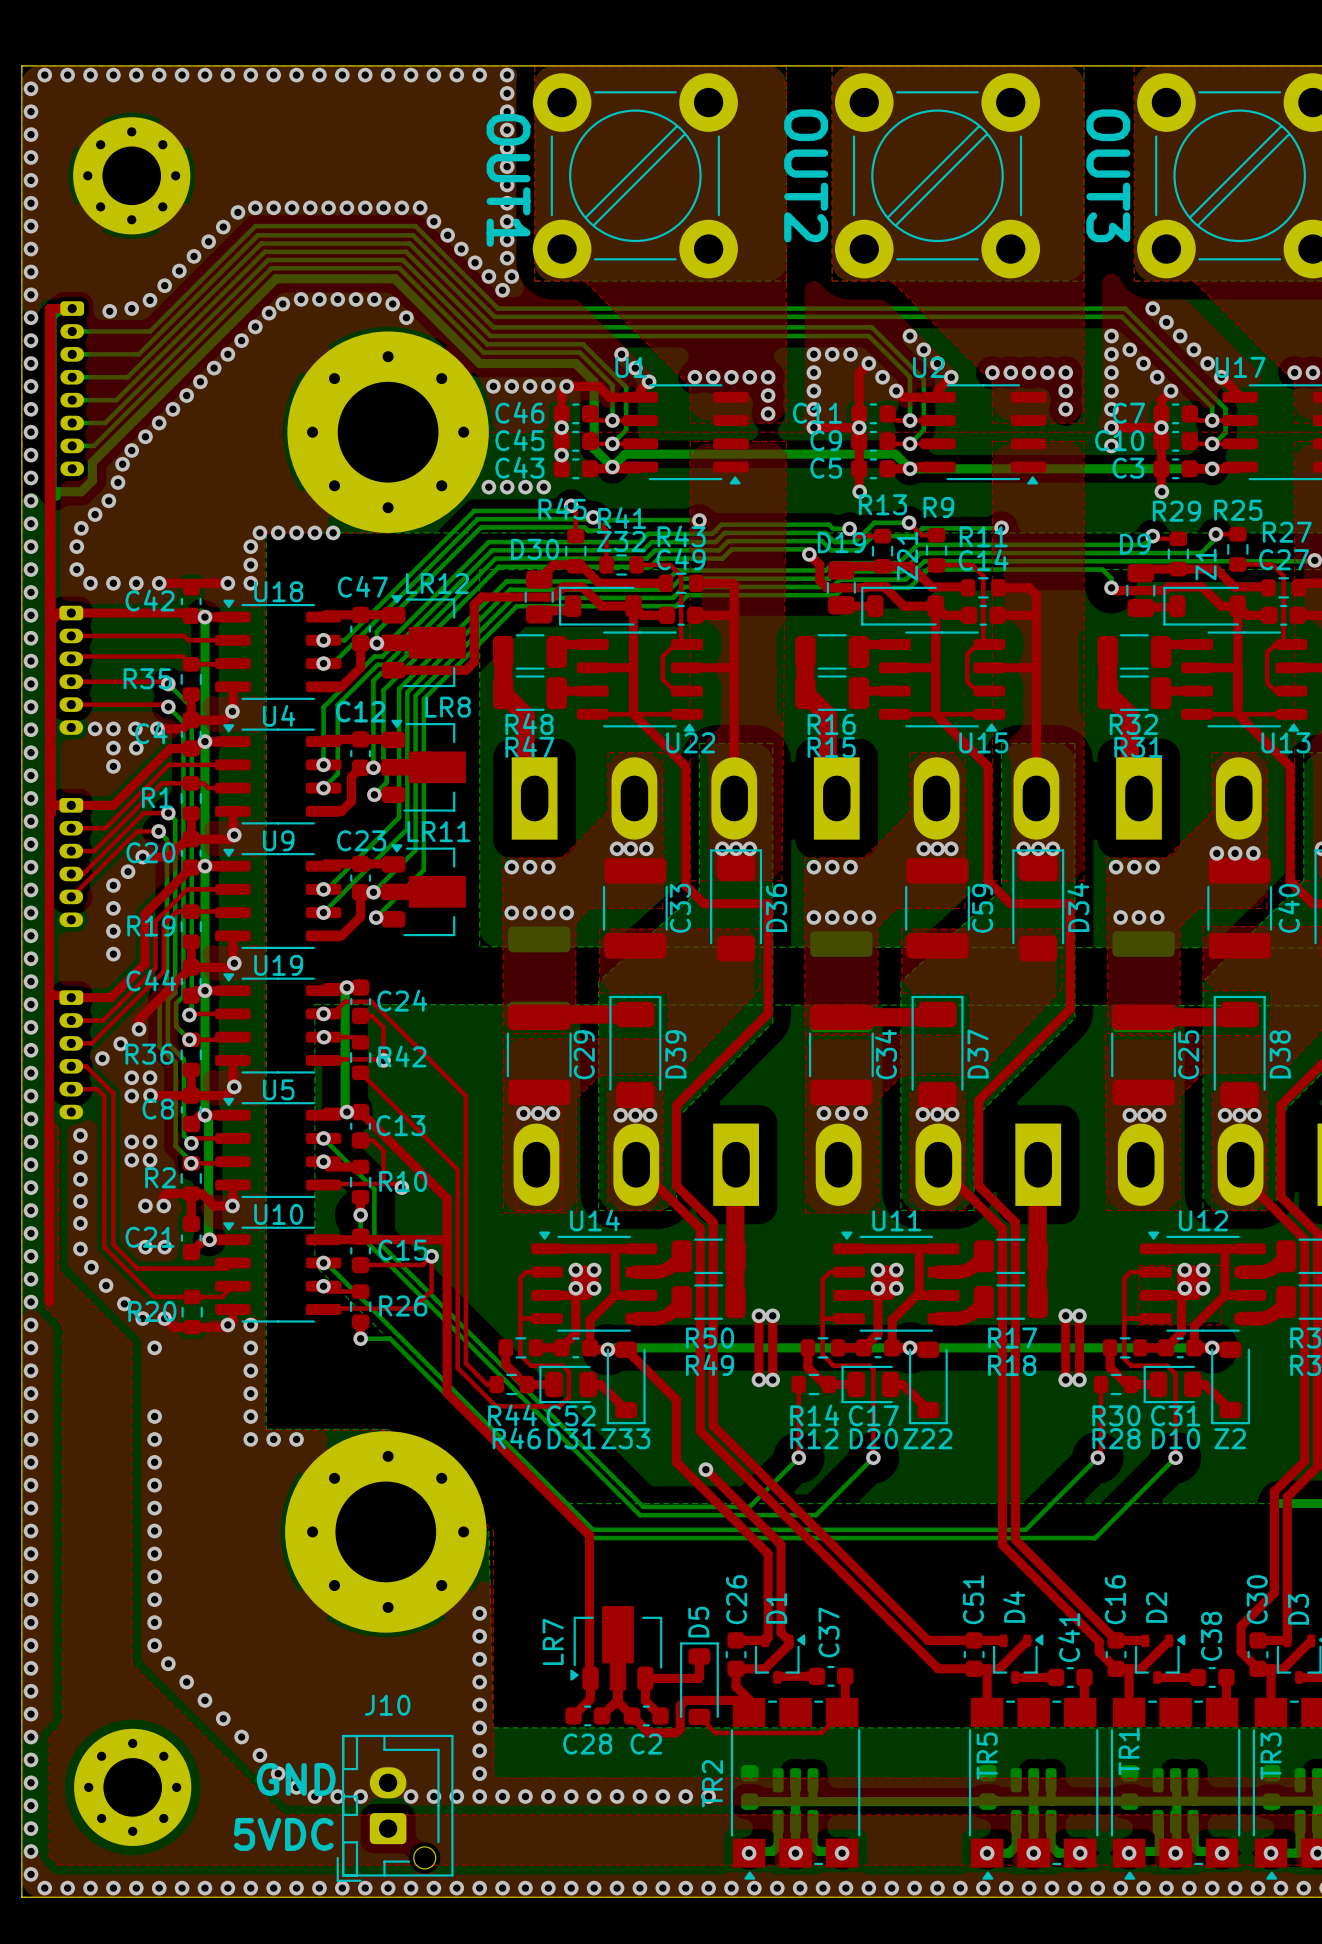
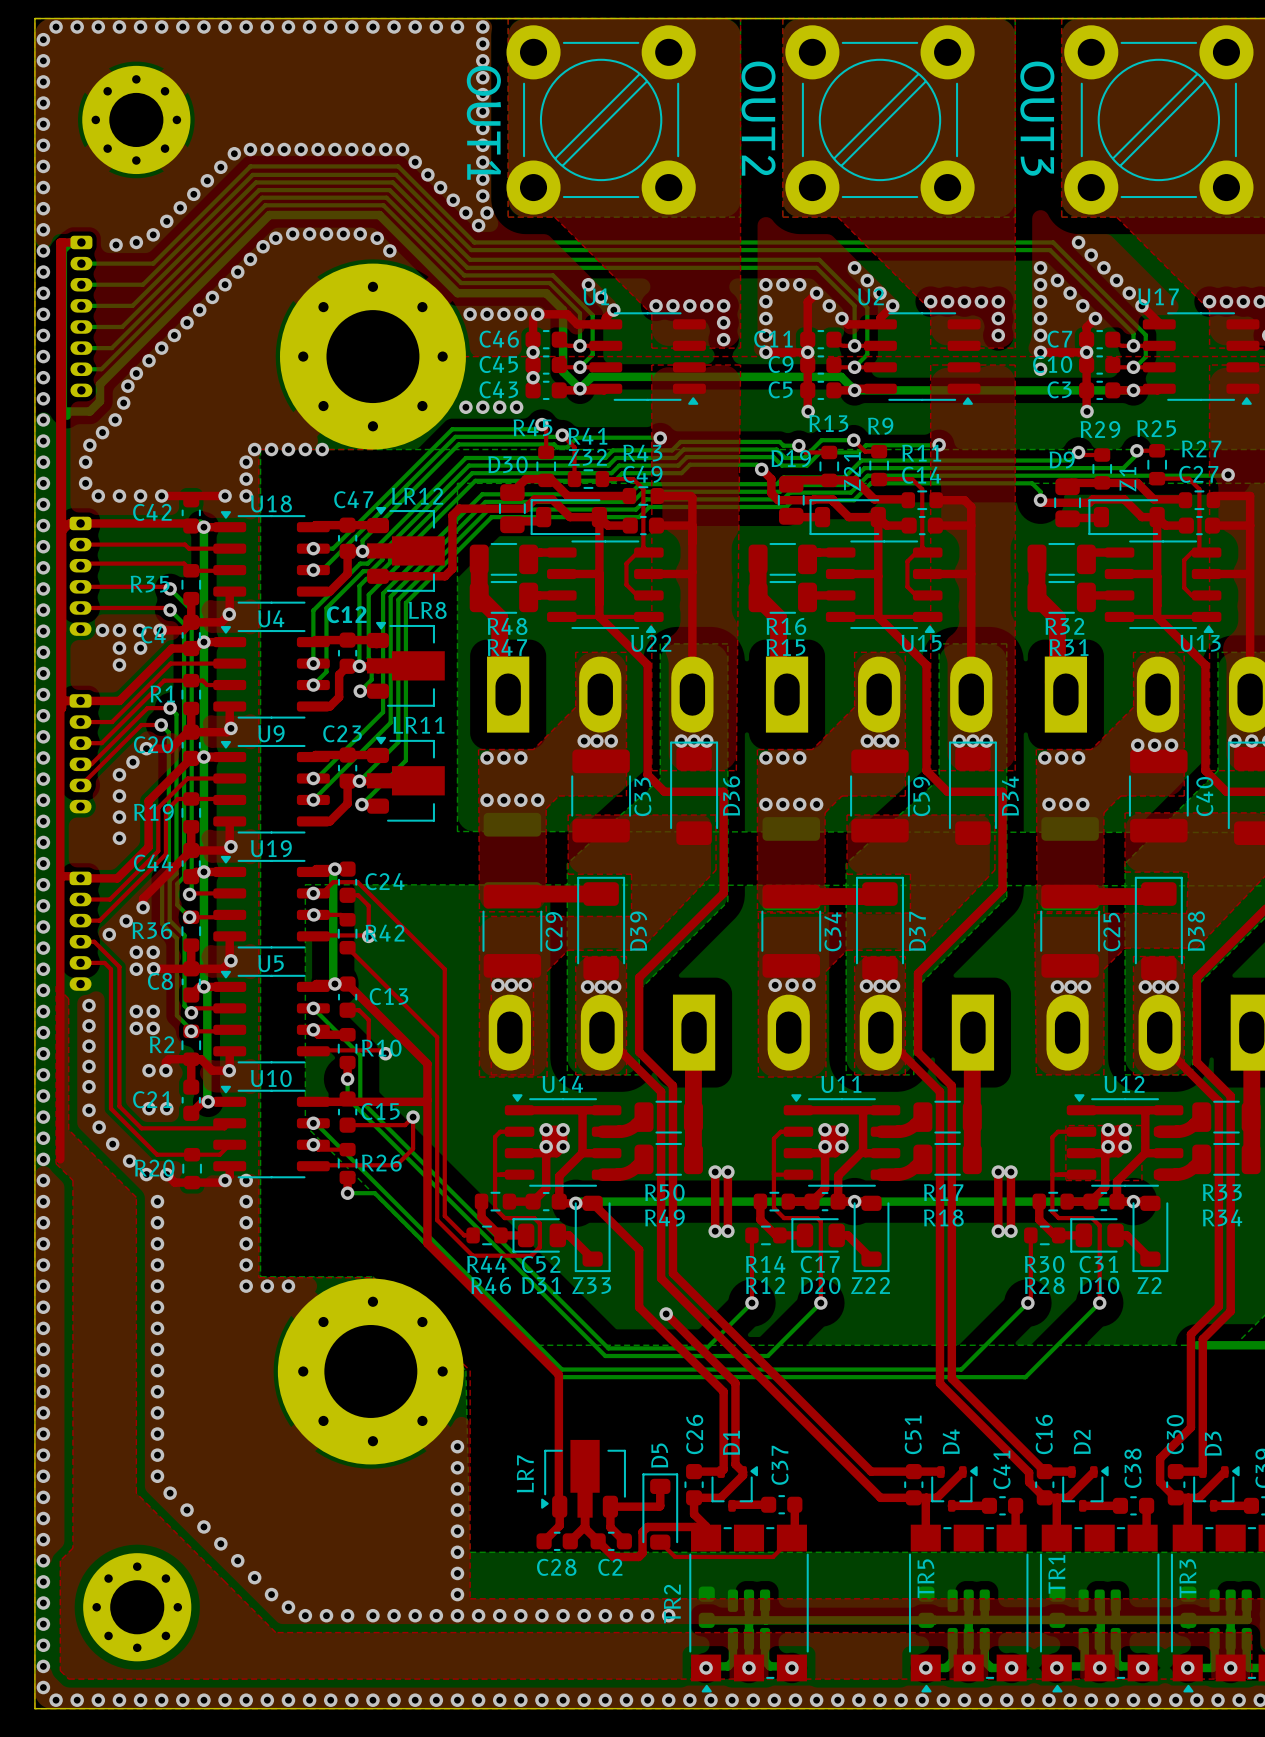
via: none -> (157, 1222)
via: none -> (157, 1243)
text: GND (296, 1779) -> none
via: none -> (372, 1615)
J10: (395, 1808) -> none
text: 5VDC (283, 1834) -> none

